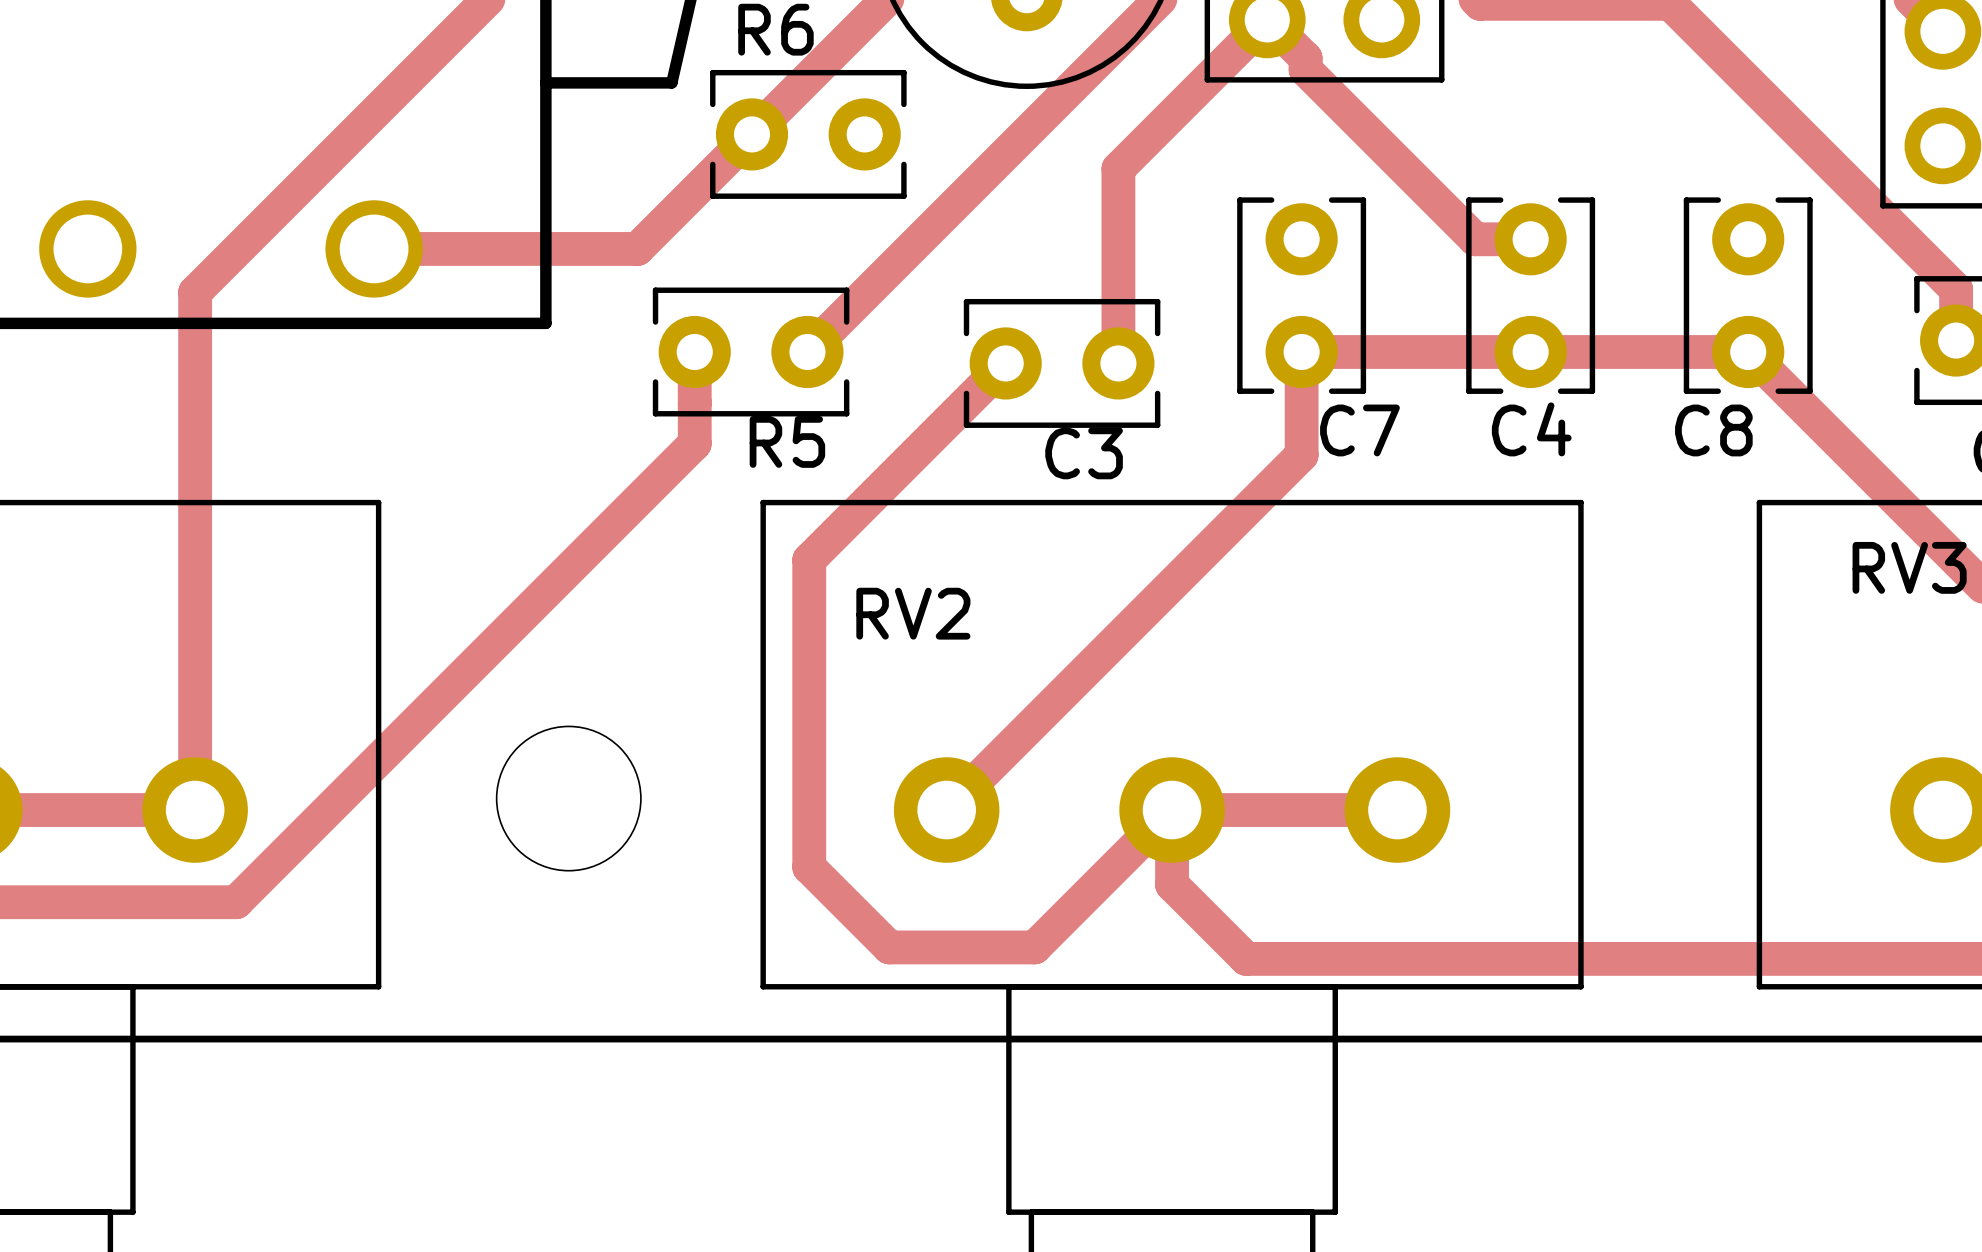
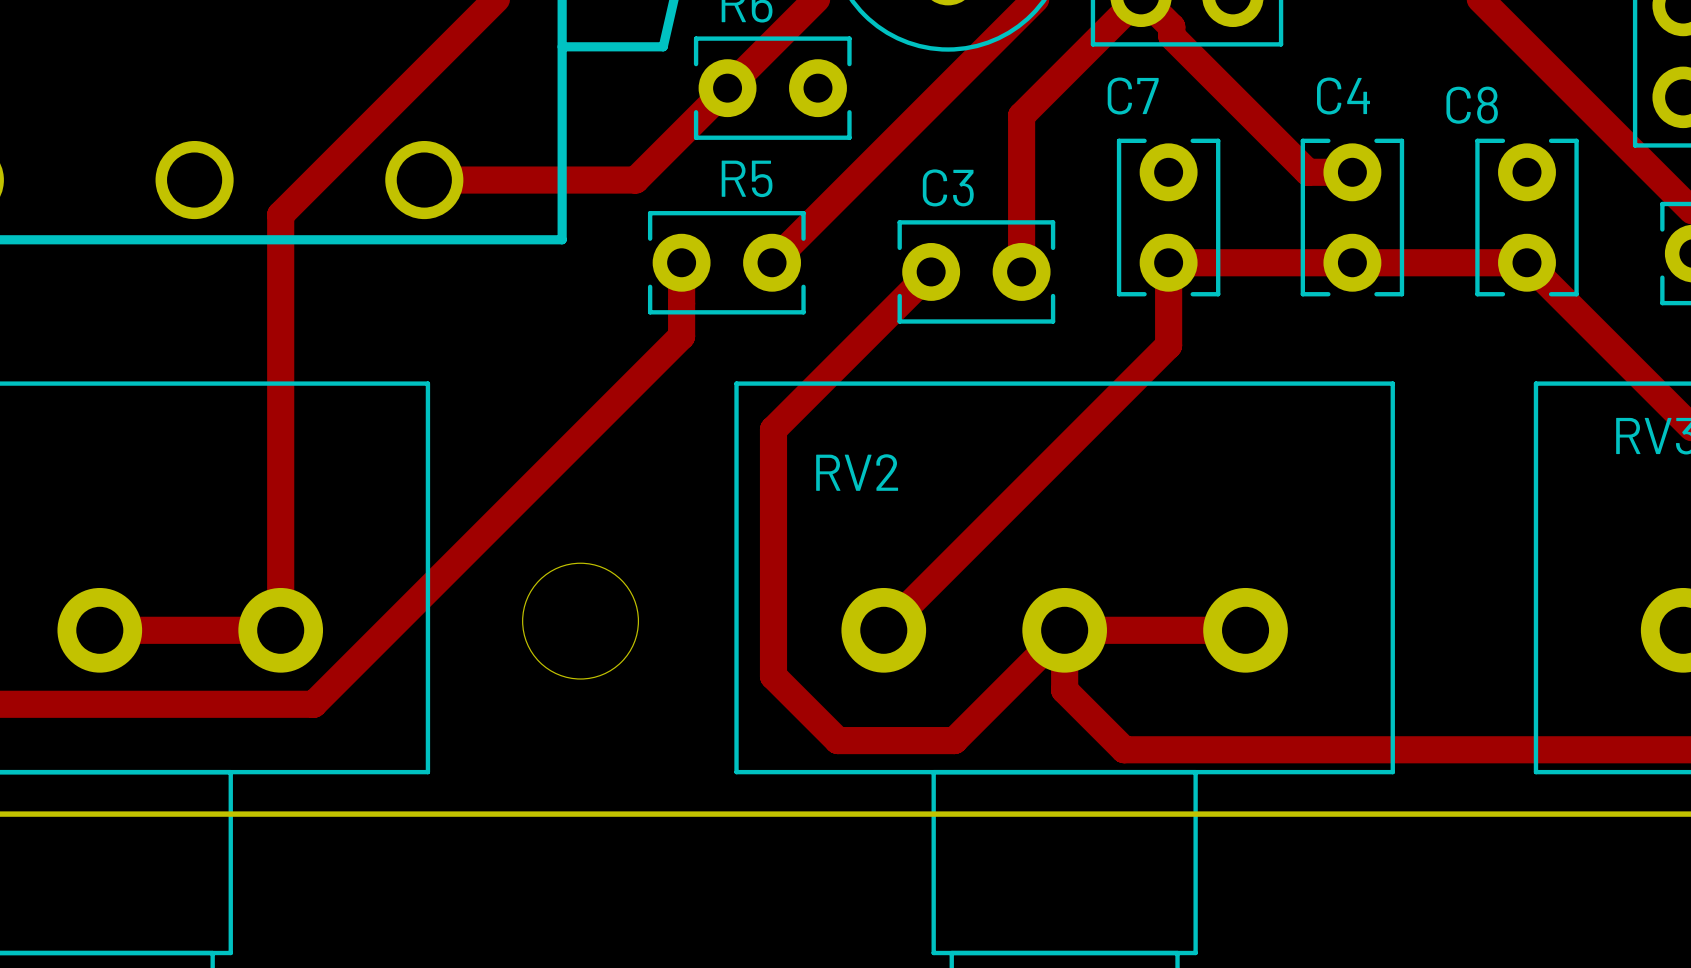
C4 name position: C4 (1531, 429) -> C4 (1343, 96)
C7 name position: C7 (1359, 430) -> C7 (1133, 96)
C8 name position: C8 (1713, 430) -> C8 (1472, 105)
R5 name position: R5 (787, 441) -> R5 (747, 178)
C3 name position: C3 (1084, 453) -> C3 (948, 187)

